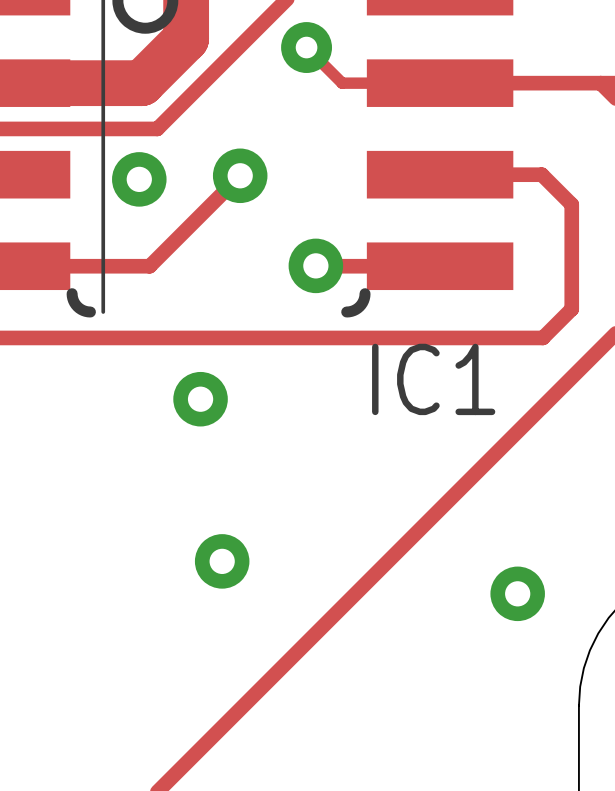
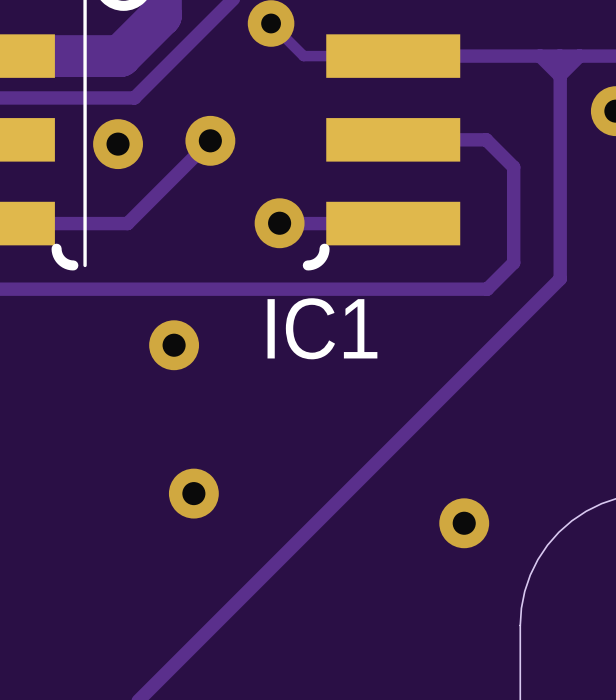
IC1 name position: IC1 (433, 379) -> IC1 (322, 328)

